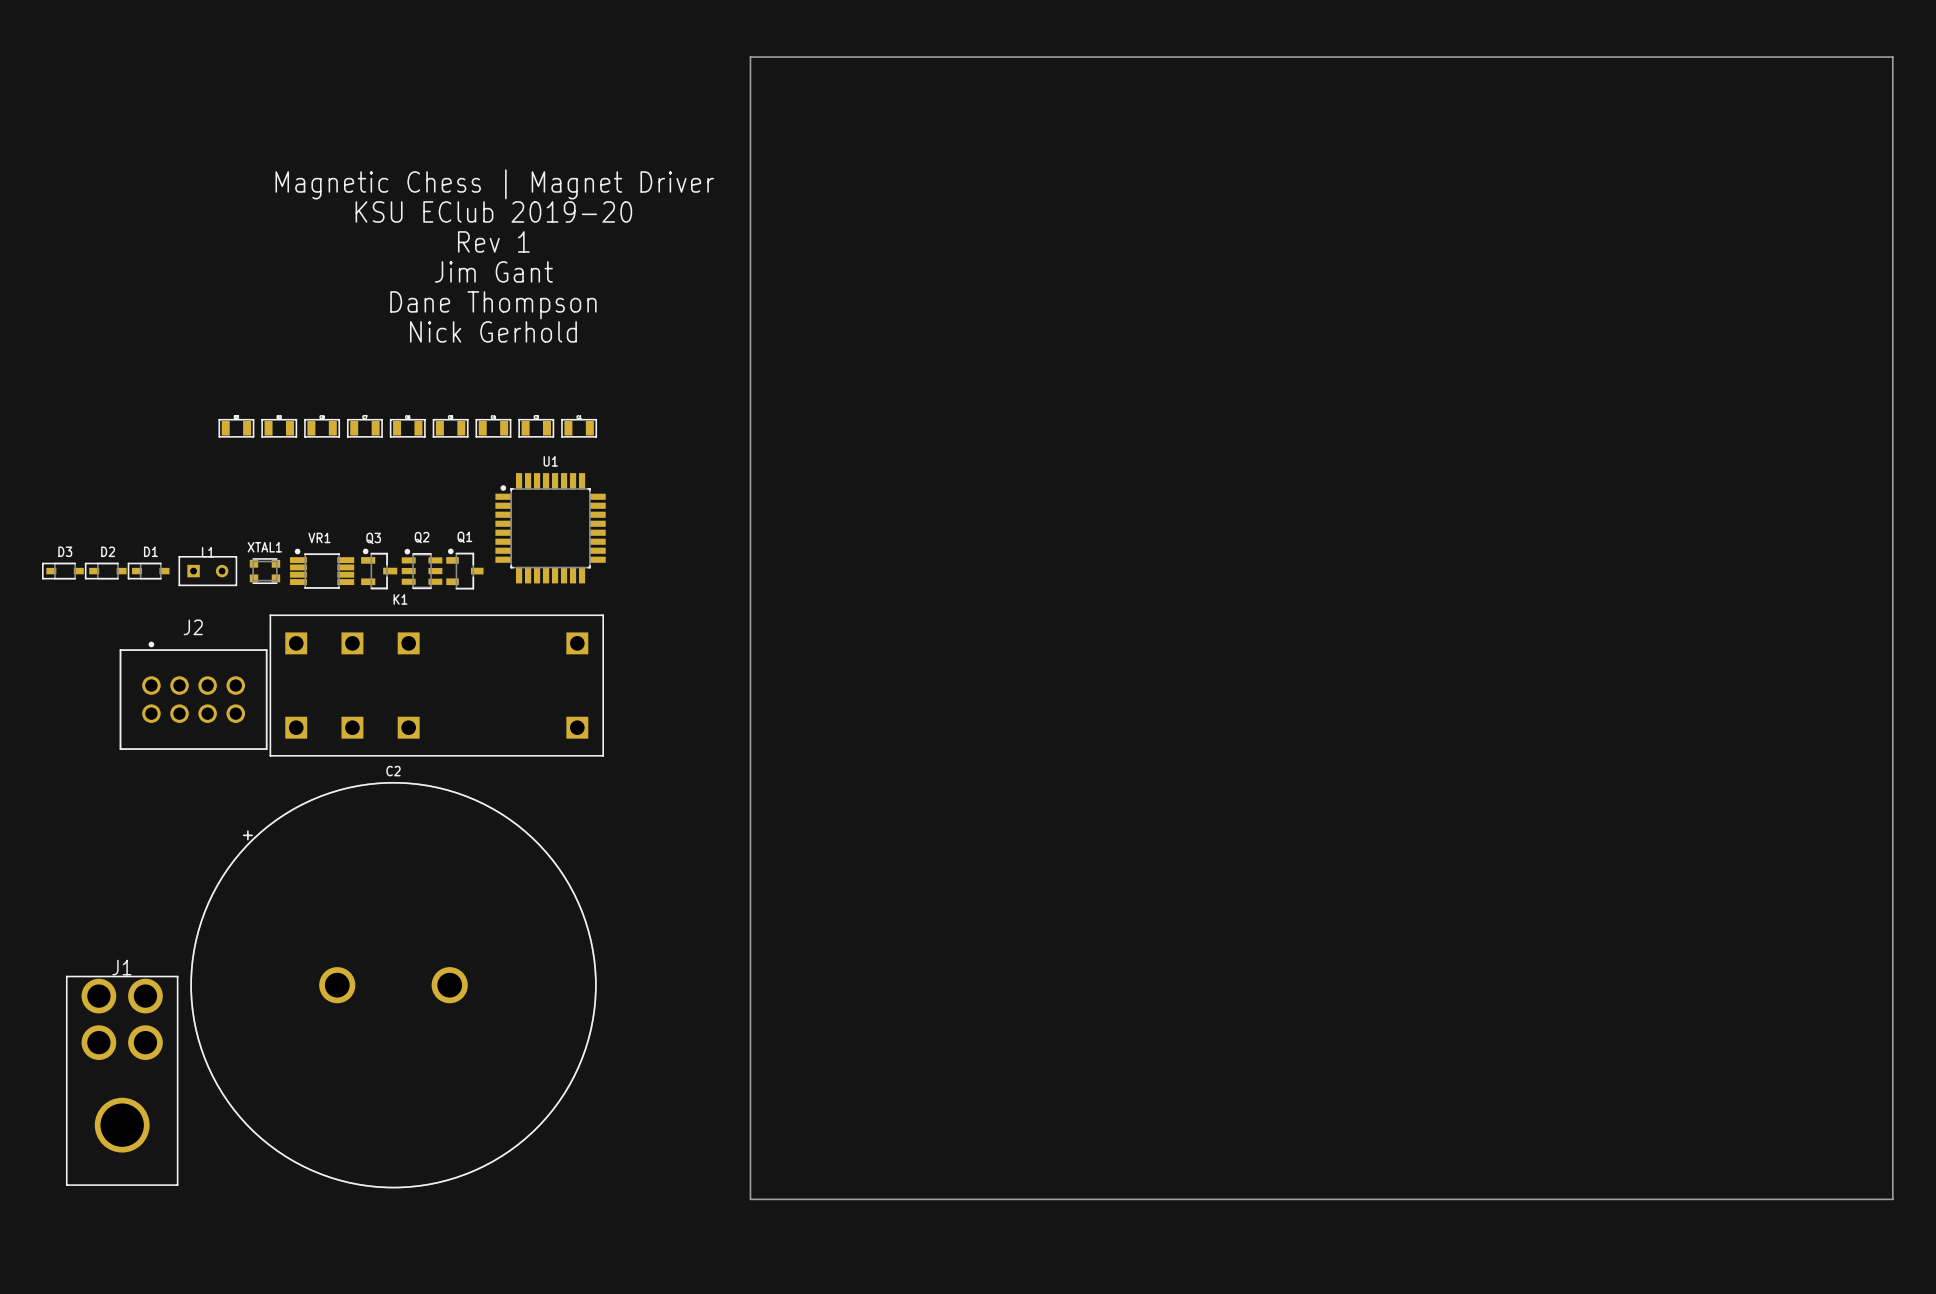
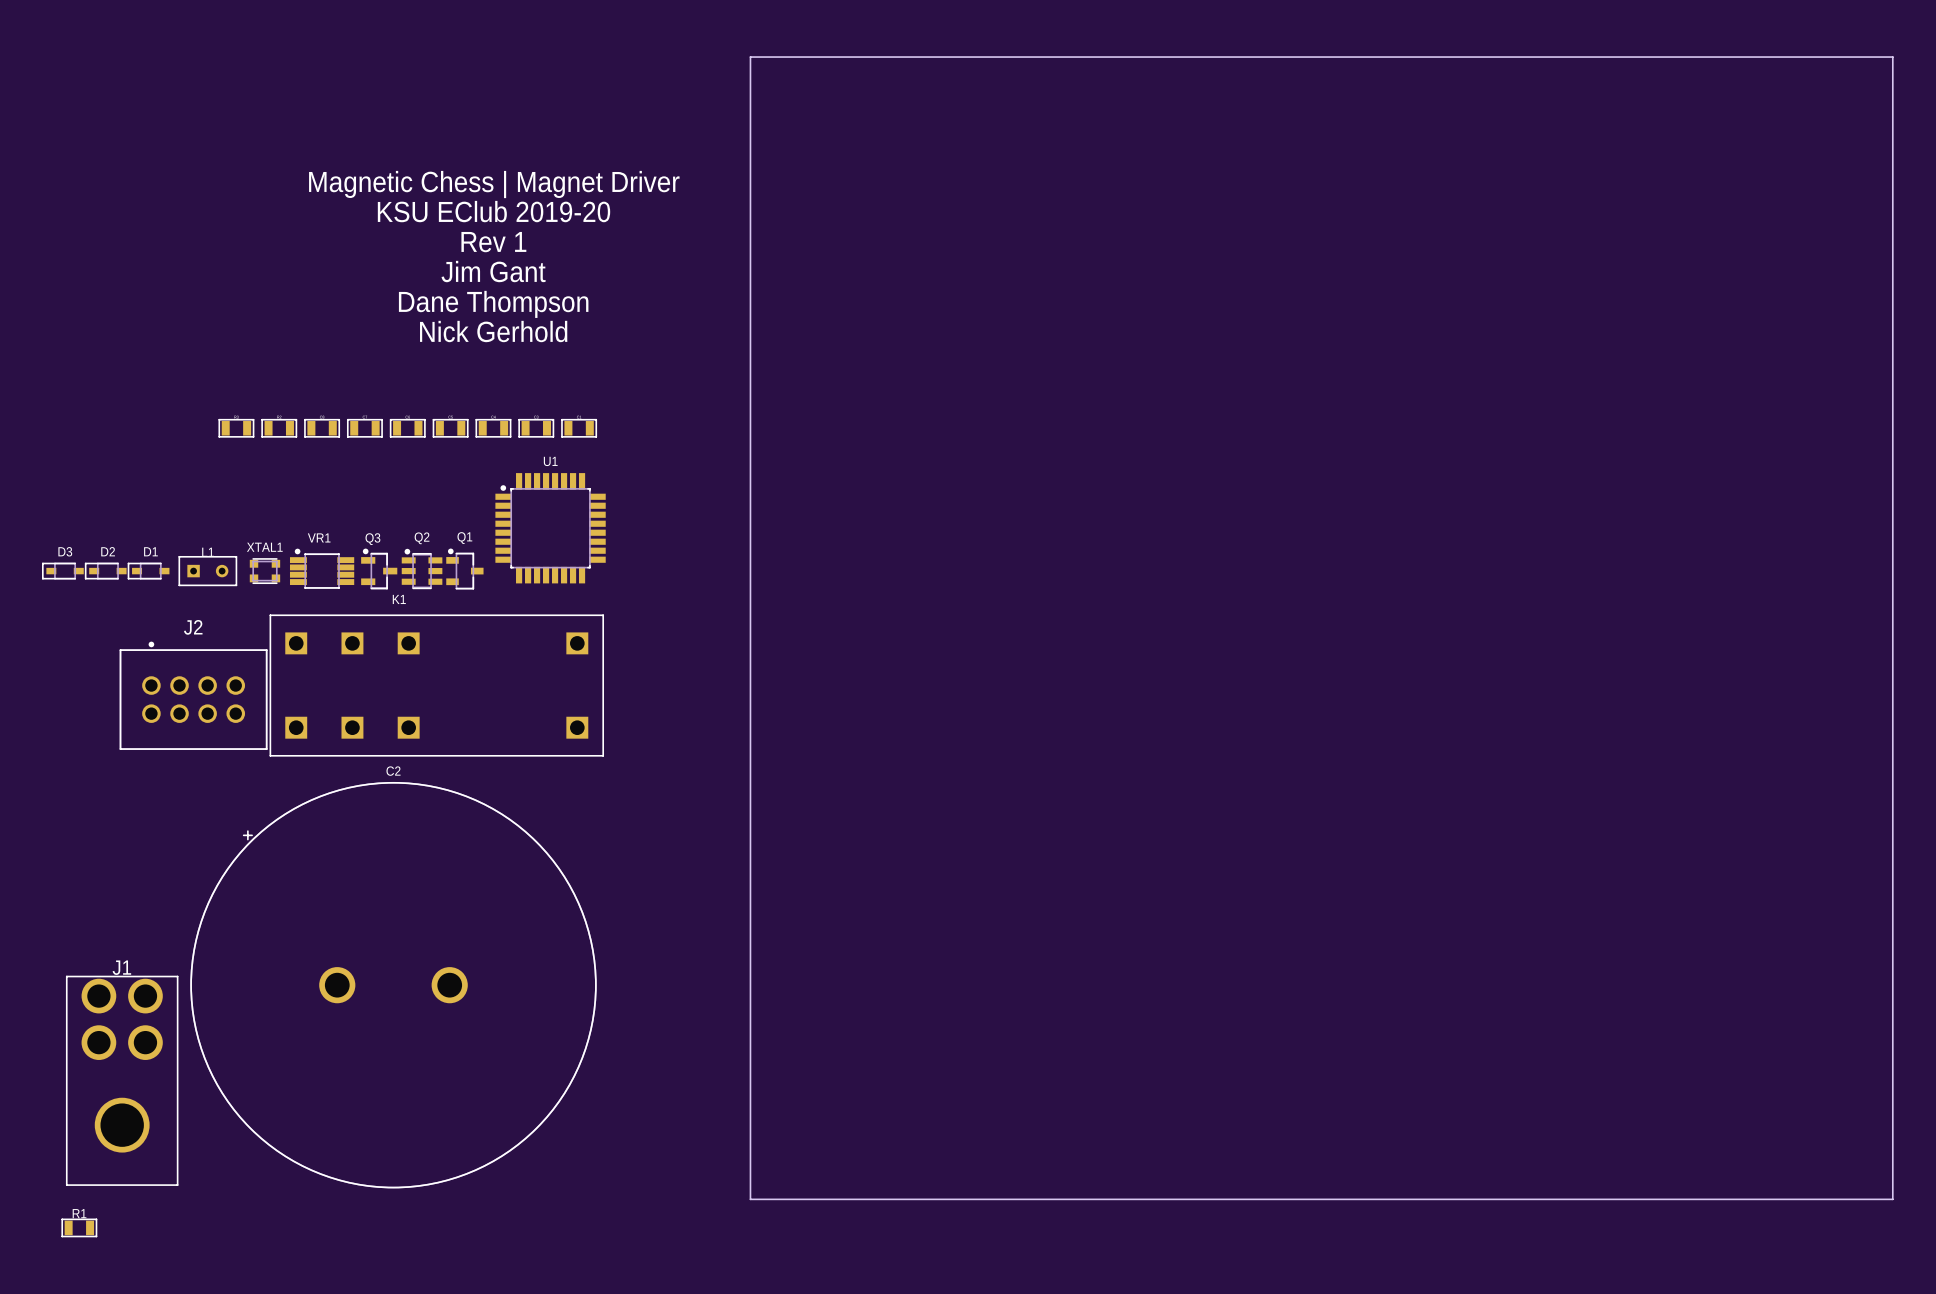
R1: none -> (79, 1227)

